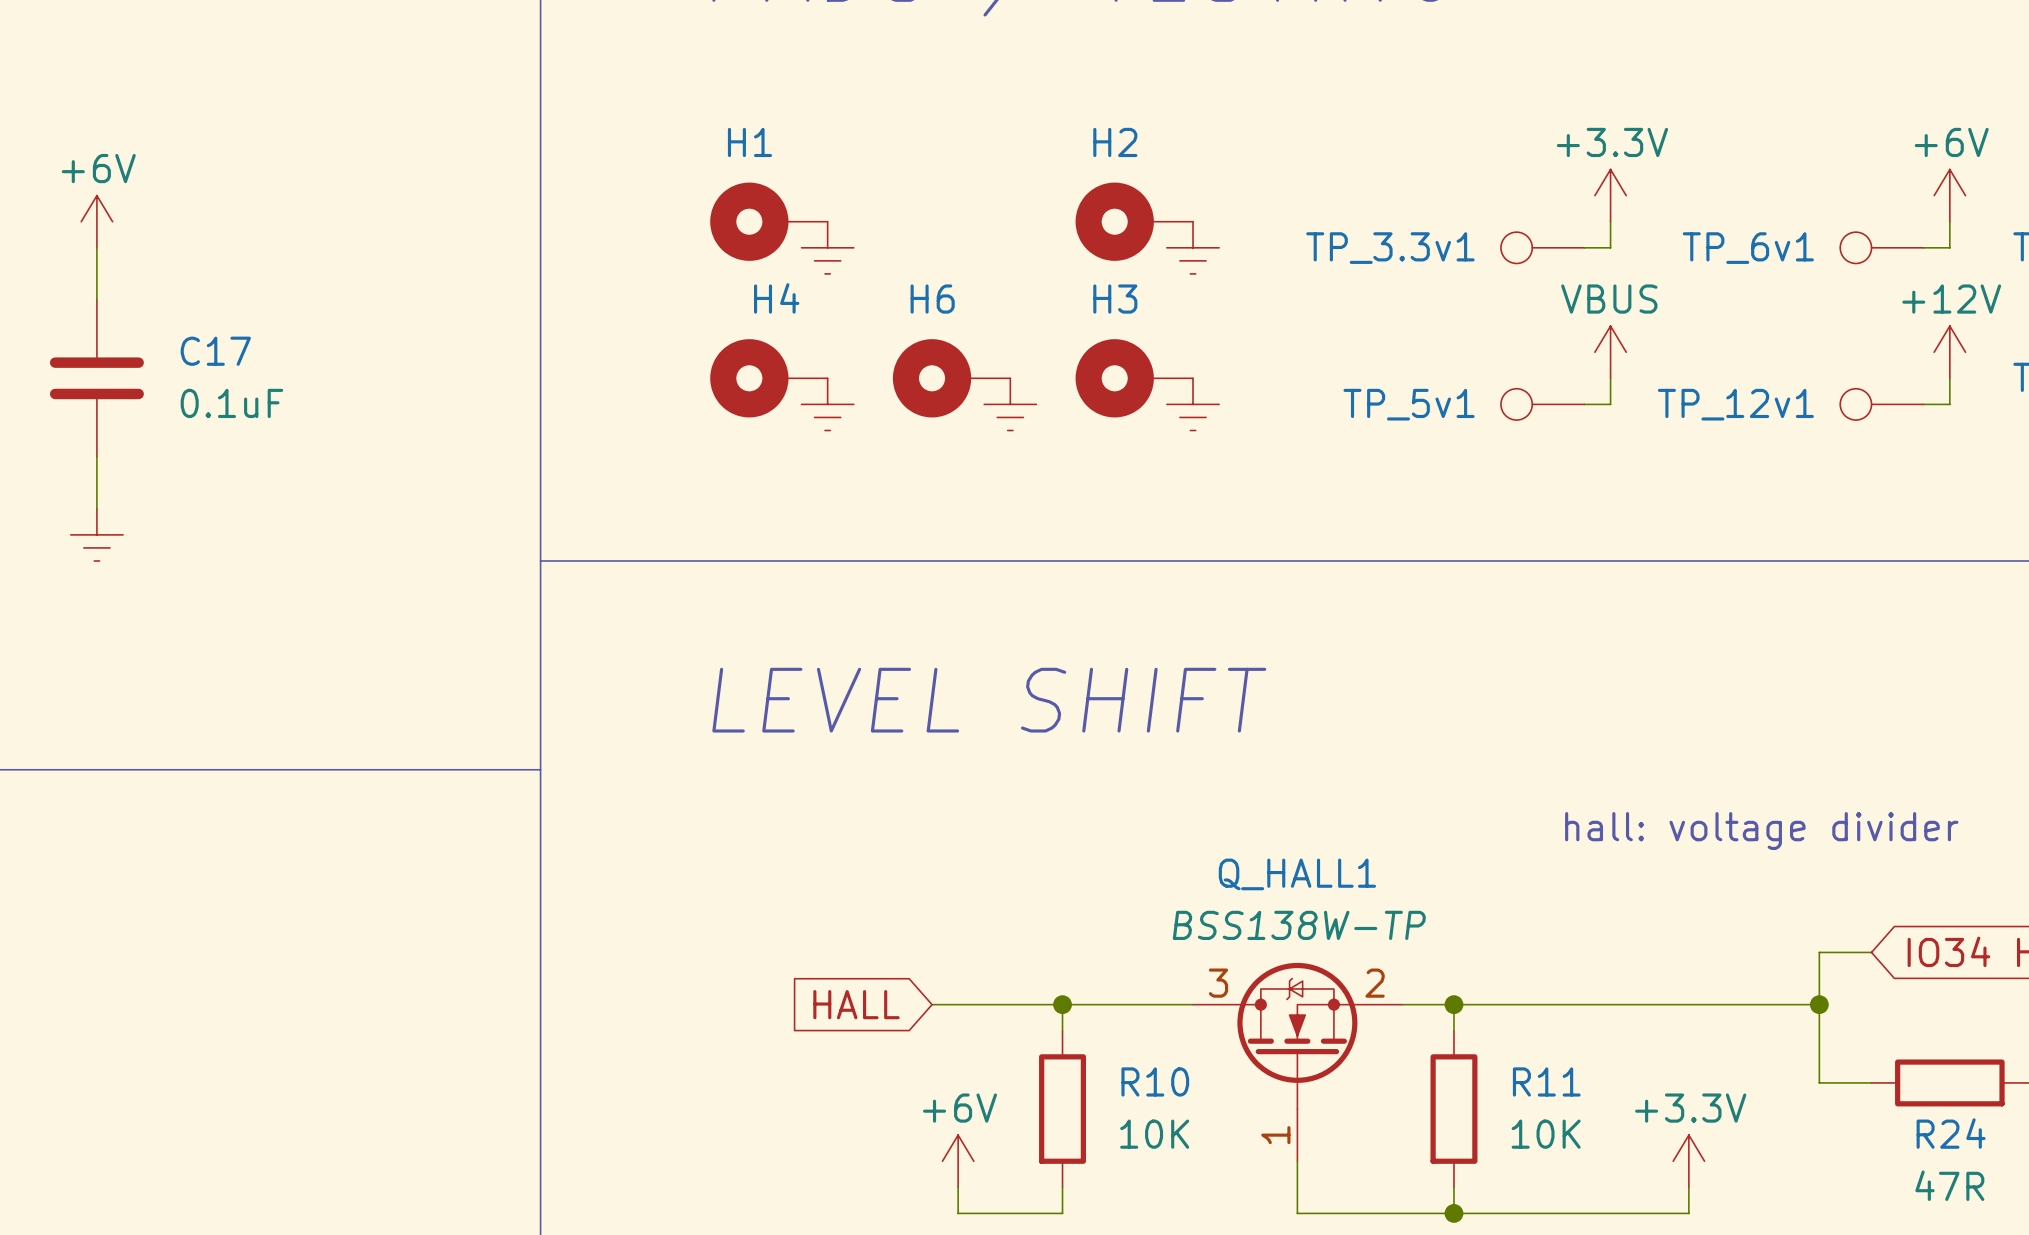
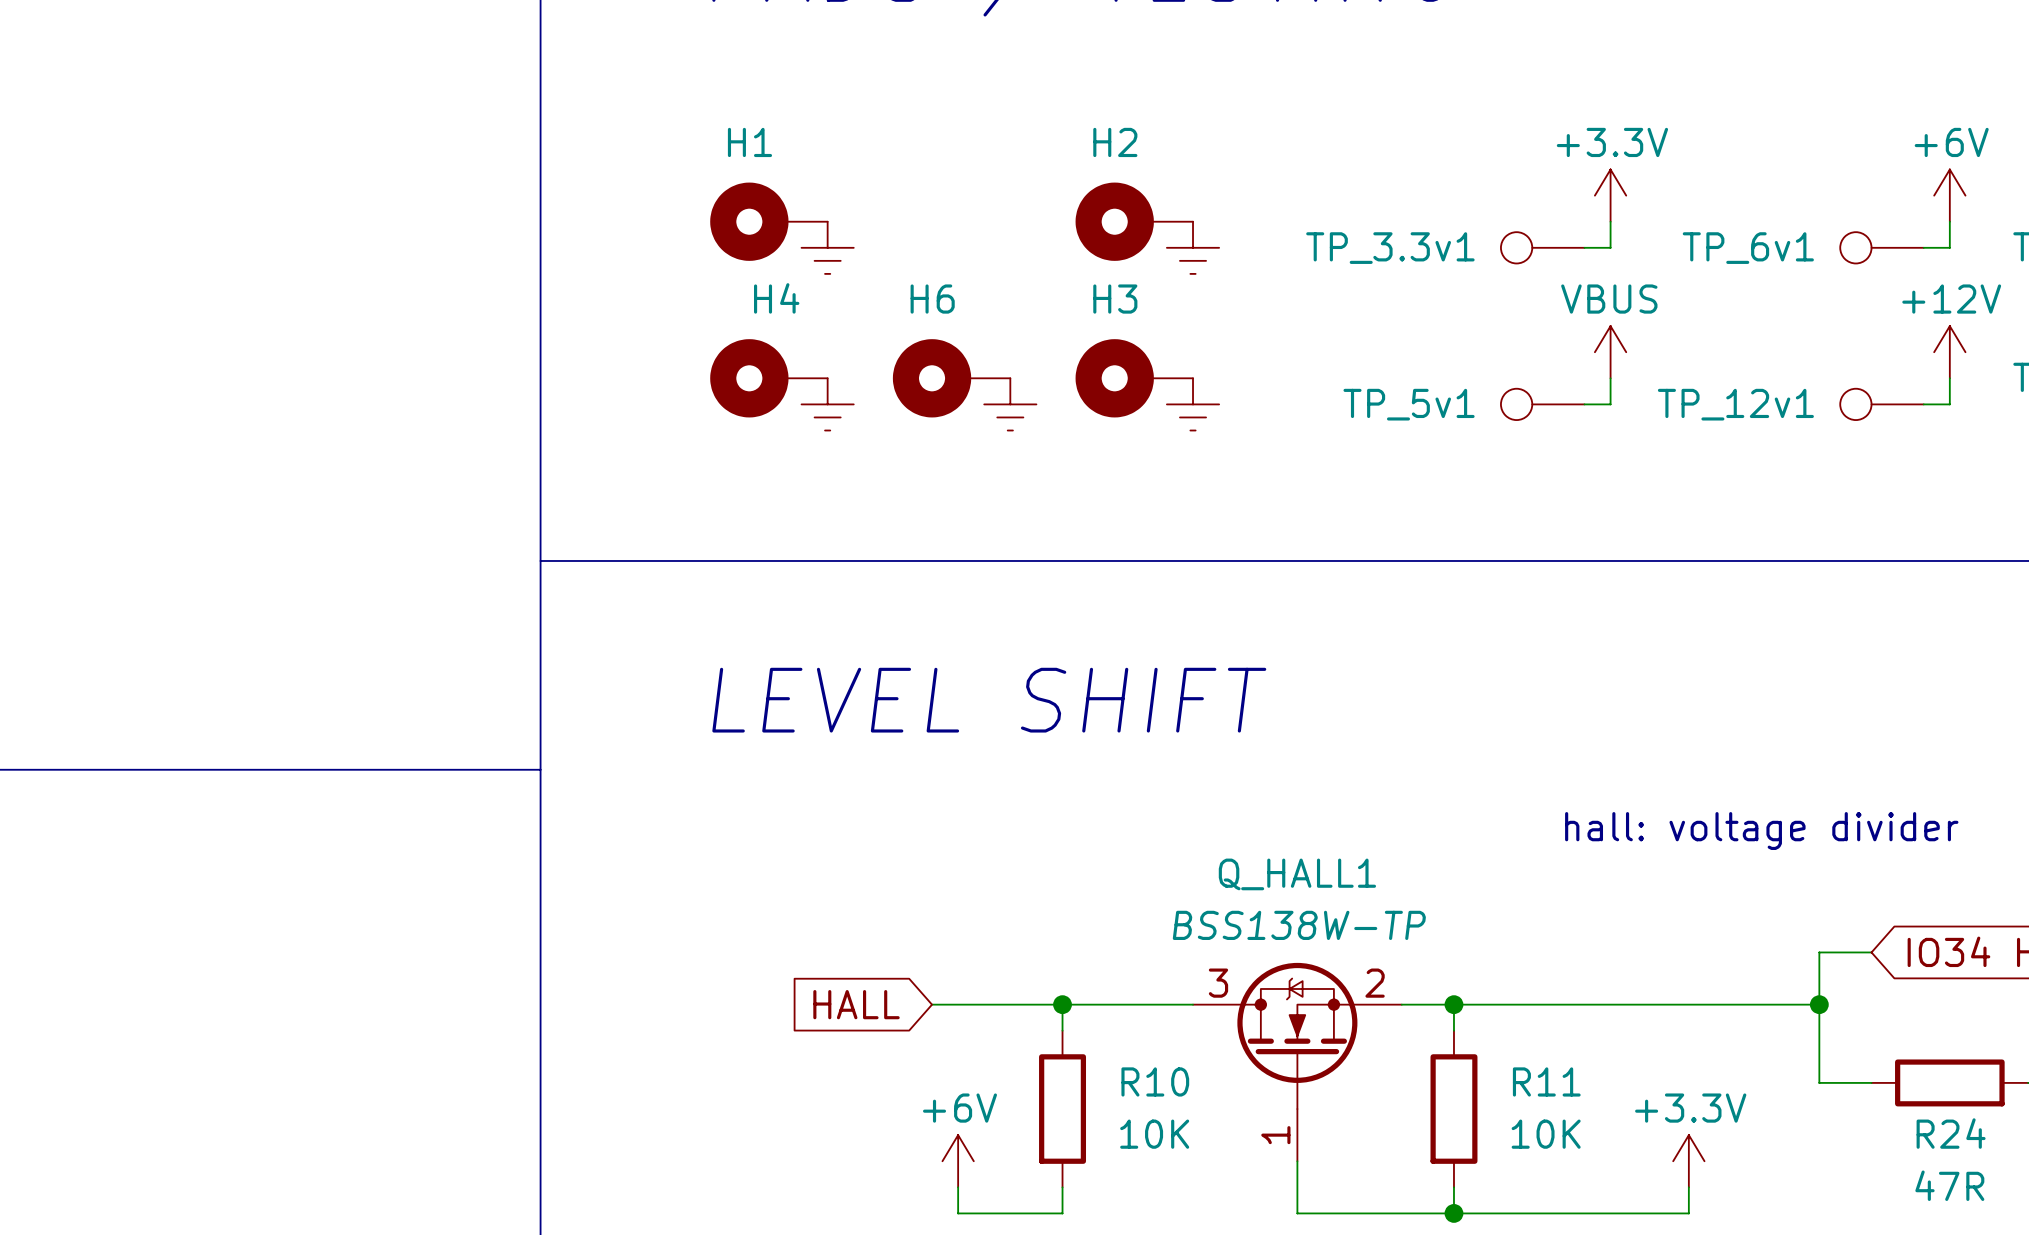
power symbol: +6V (96, 221) -> none
wire: (96, 247) (96, 300) -> none
C17: 0.1uF (96, 378) -> none
wire: (96, 456) (96, 508) -> none
power symbol: (96, 534) -> none

